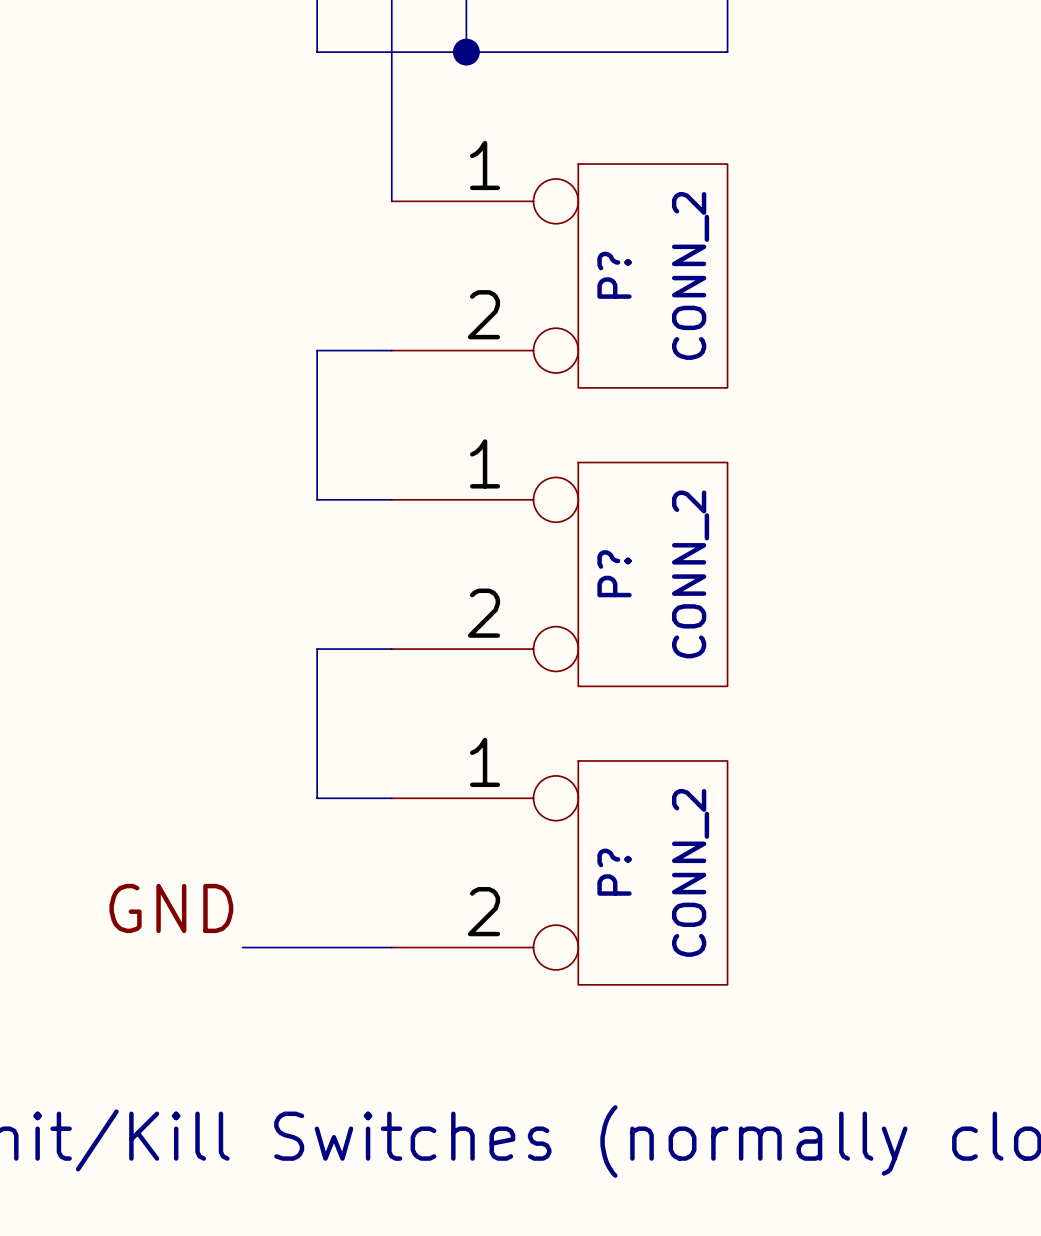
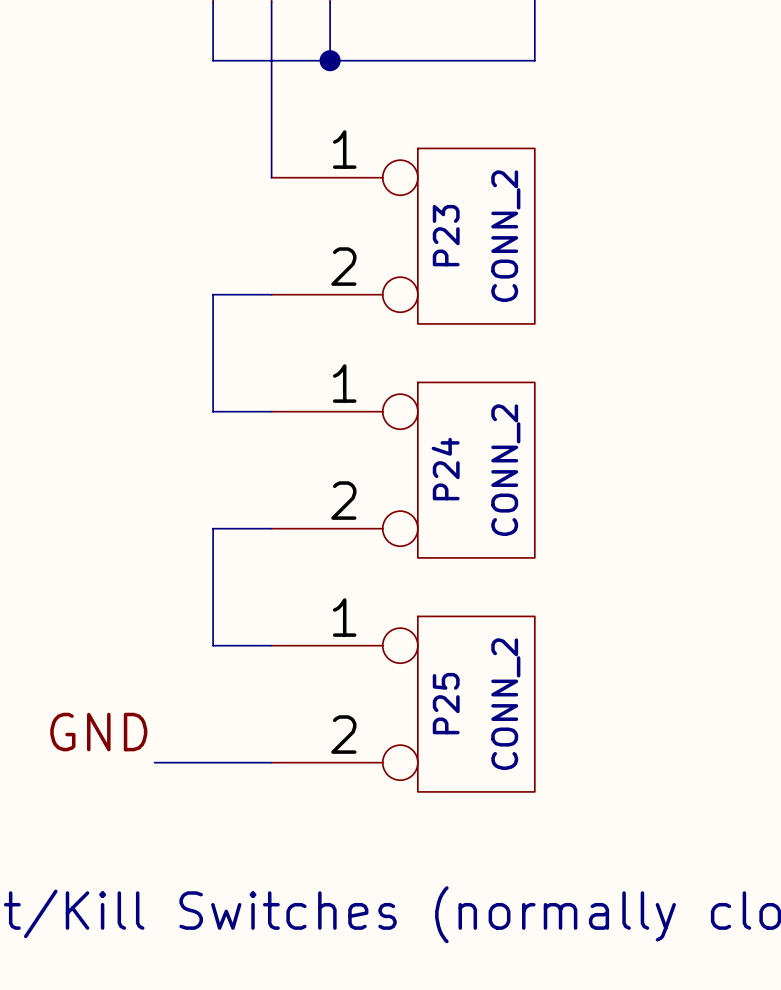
P? name: P? (614, 275) -> P23 (446, 235)
P? name: P? (614, 573) -> P24 (445, 469)
P? name: P? (614, 872) -> P25 (446, 703)

